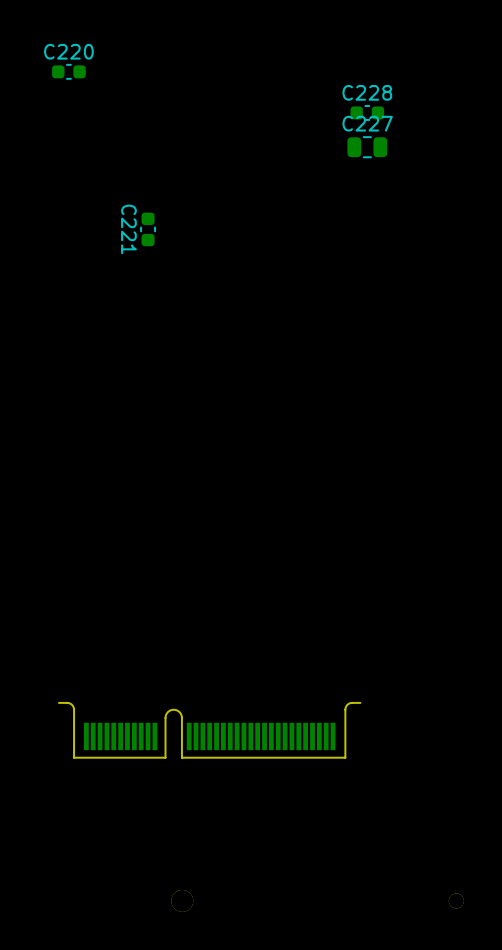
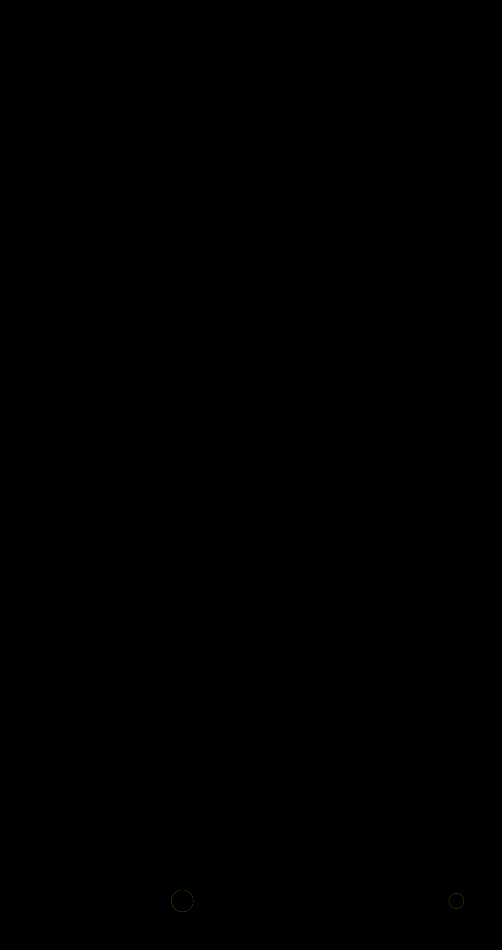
C220: (68, 71) -> none
C228: (367, 112) -> none
C227: (367, 147) -> none
C221: (148, 229) -> none
part: (209, 730) -> none

